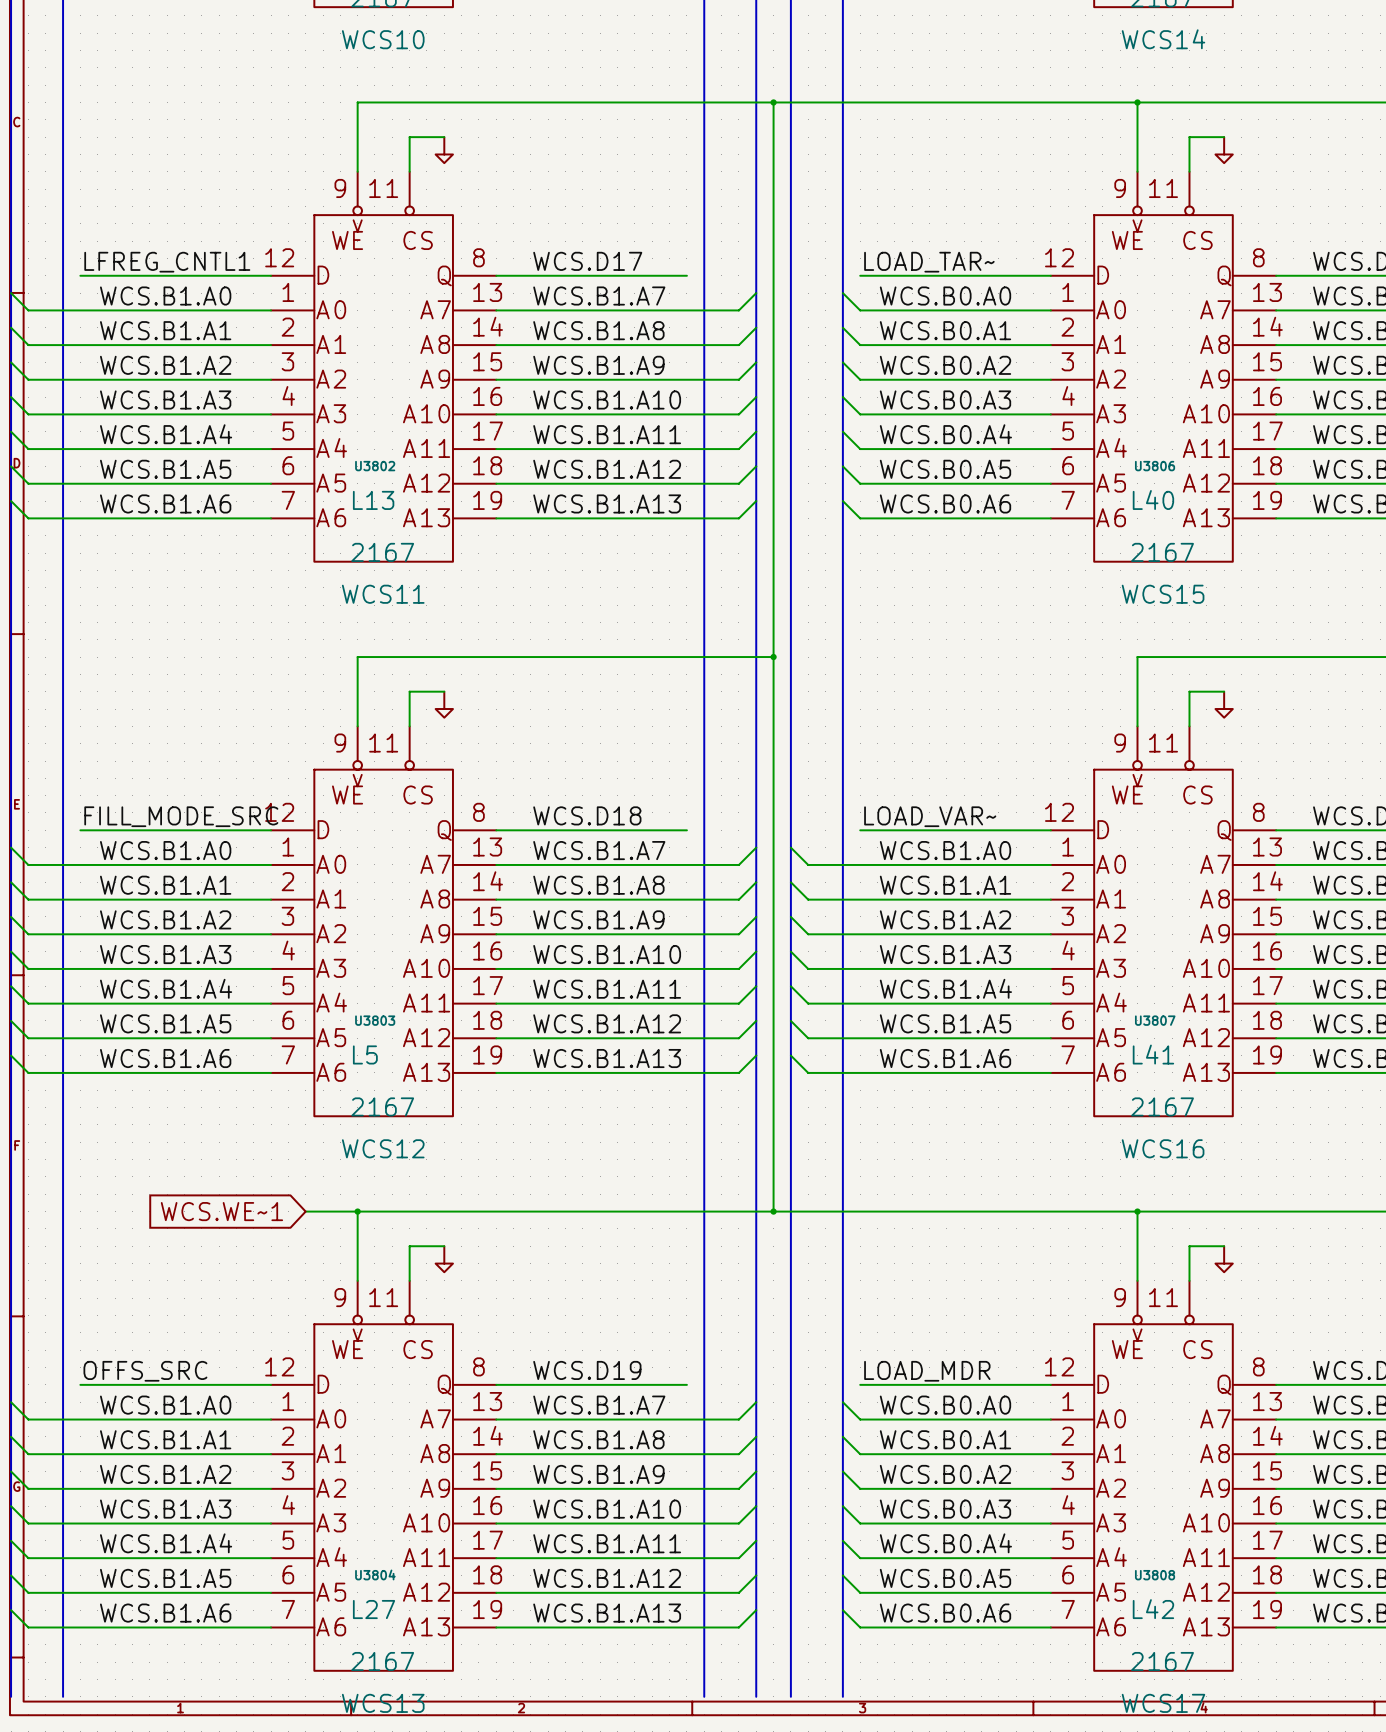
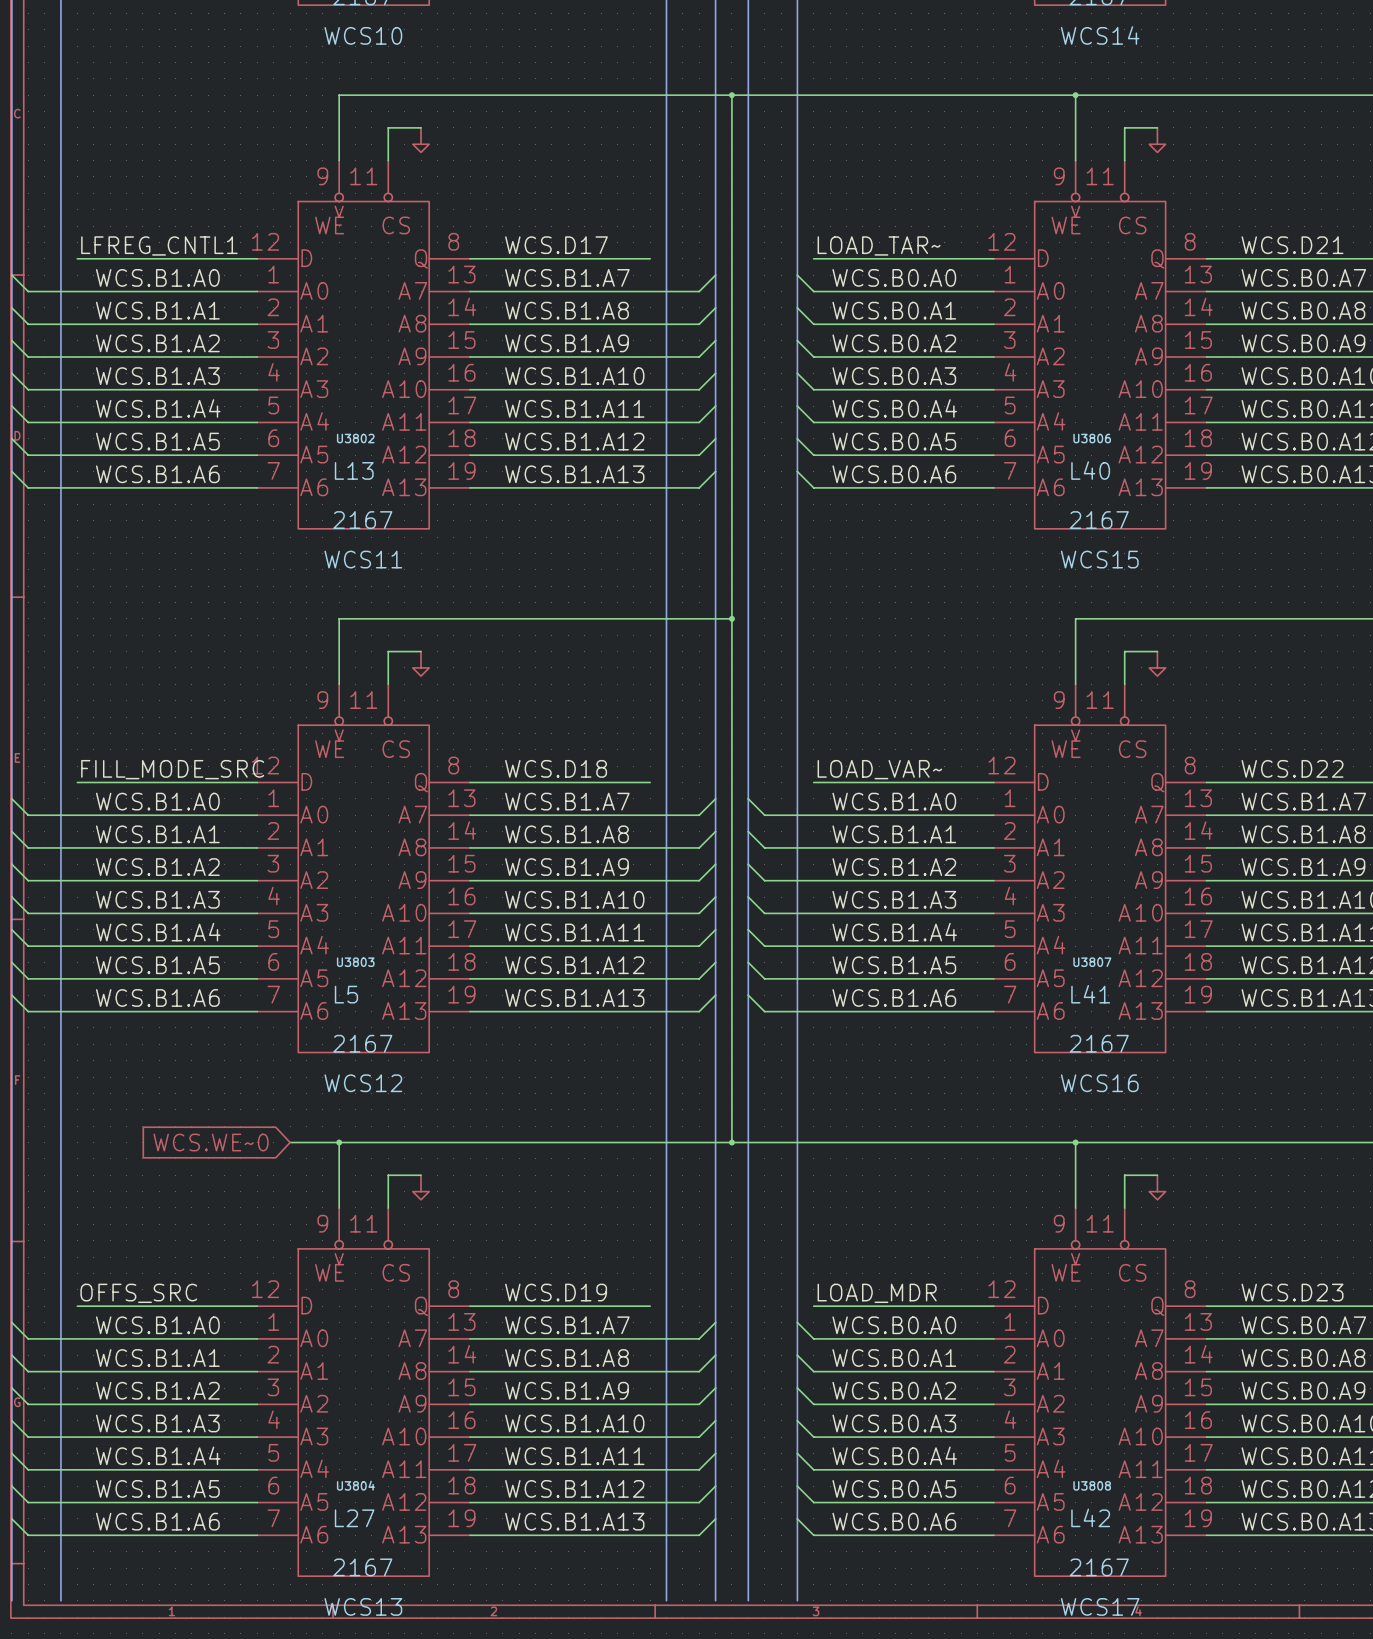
global label: WCS.WE~1 (221, 1211) -> WCS.WE~0 (211, 1142)

